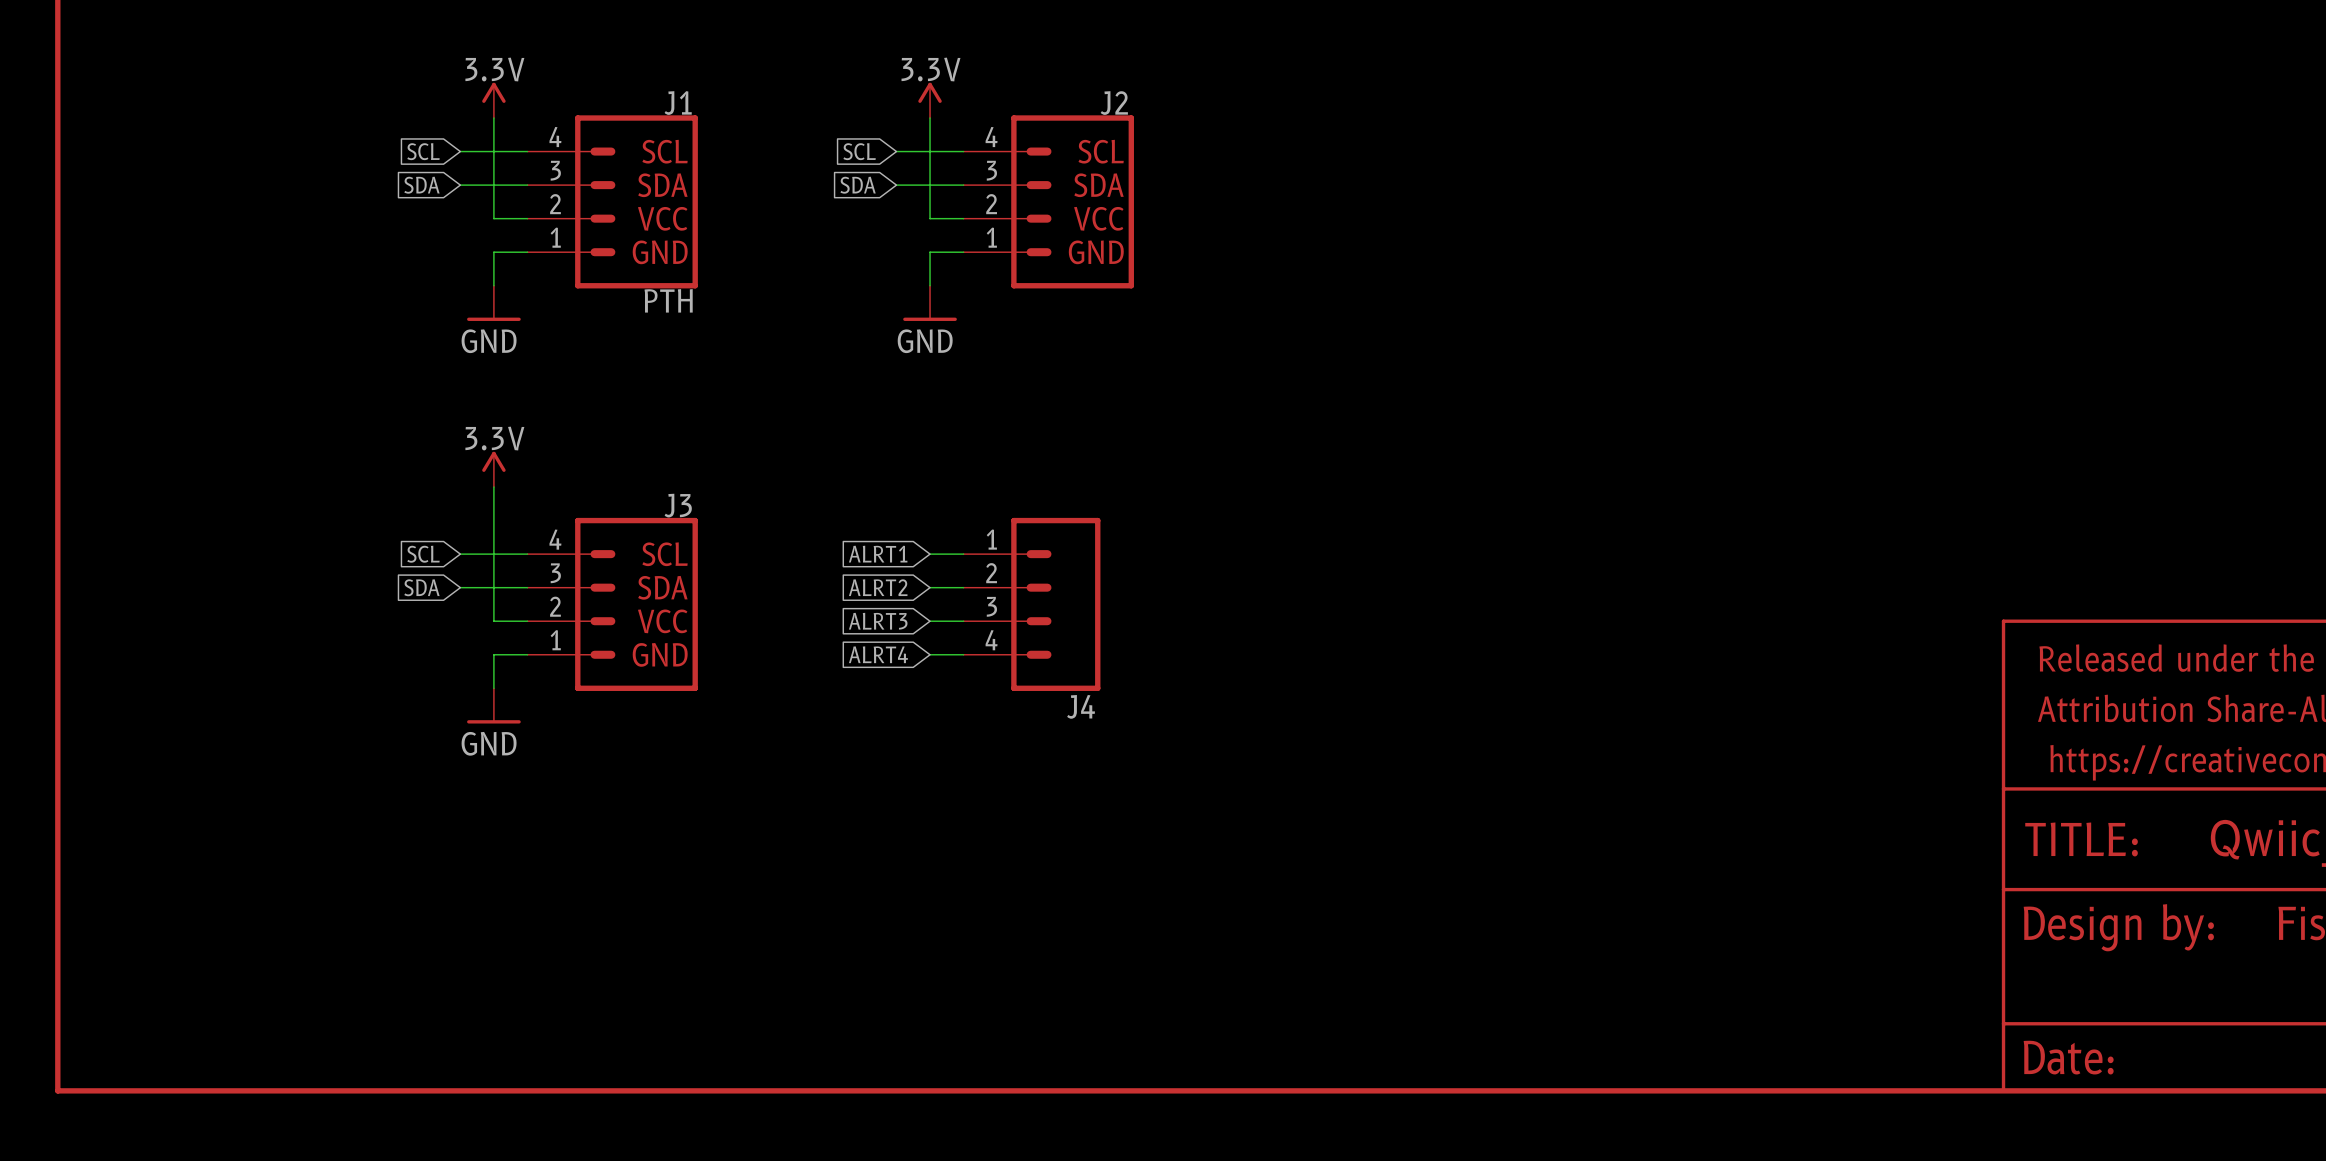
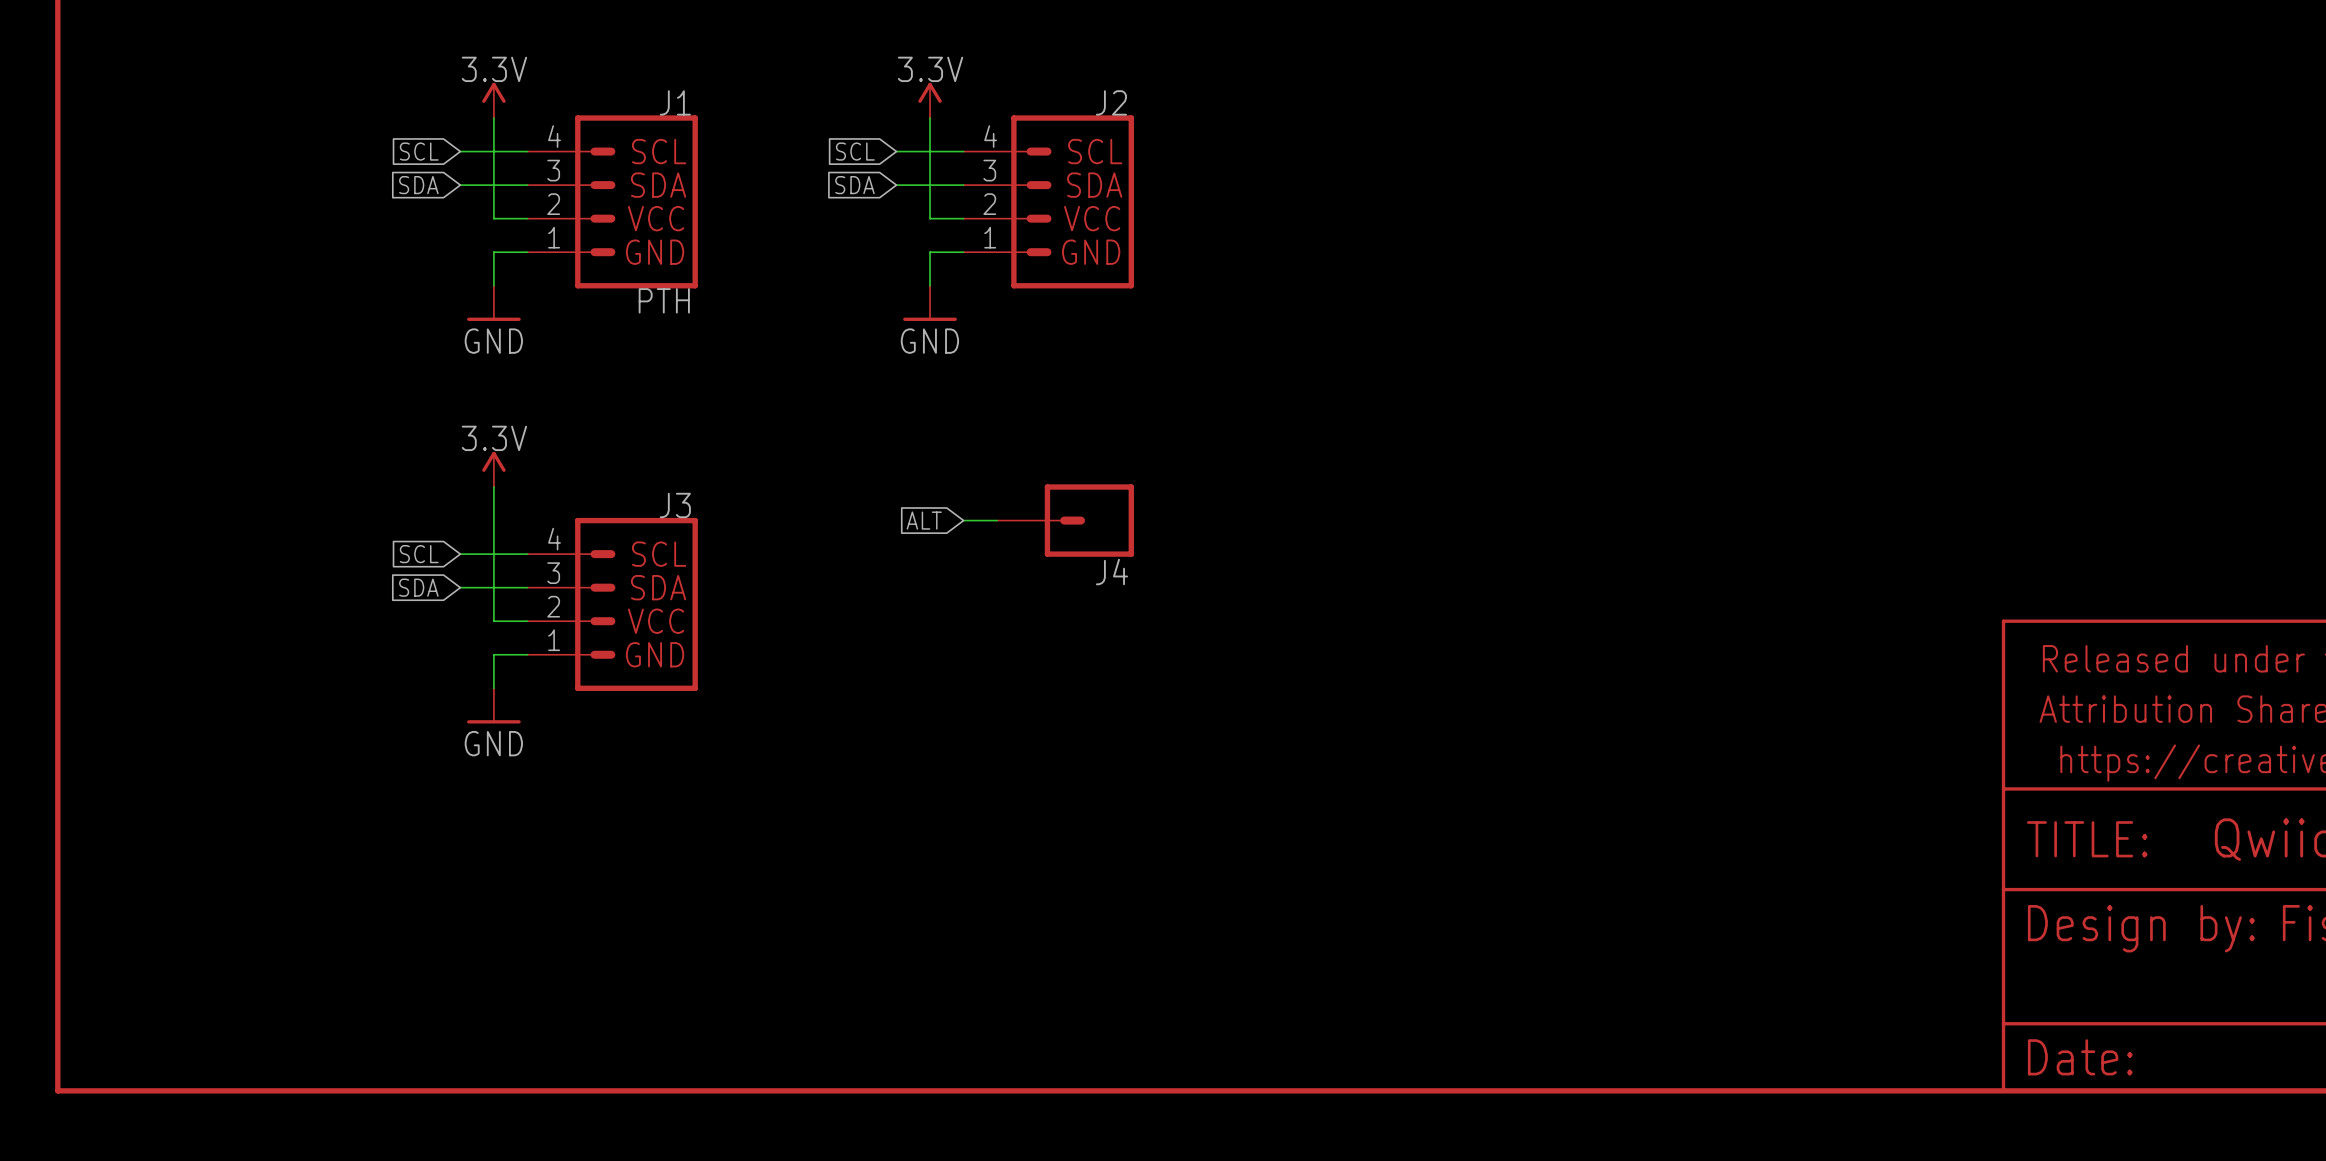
J4 symbol: [963, 517, 1101, 691] -> [997, 484, 1134, 557]
global label: ALRT1 (878, 554) -> ALT (924, 520)
wire: (930, 554) (963, 554) -> (963, 520) (997, 520)
global label: ALRT2 (878, 587) -> none
wire: (930, 587) (963, 587) -> none
global label: ALRT3 (878, 621) -> none
wire: (930, 621) (963, 621) -> none
global label: ALRT4 (878, 654) -> none
wire: (930, 654) (963, 654) -> none
J4 name position: J4 (1081, 706) -> J4 (1111, 572)

